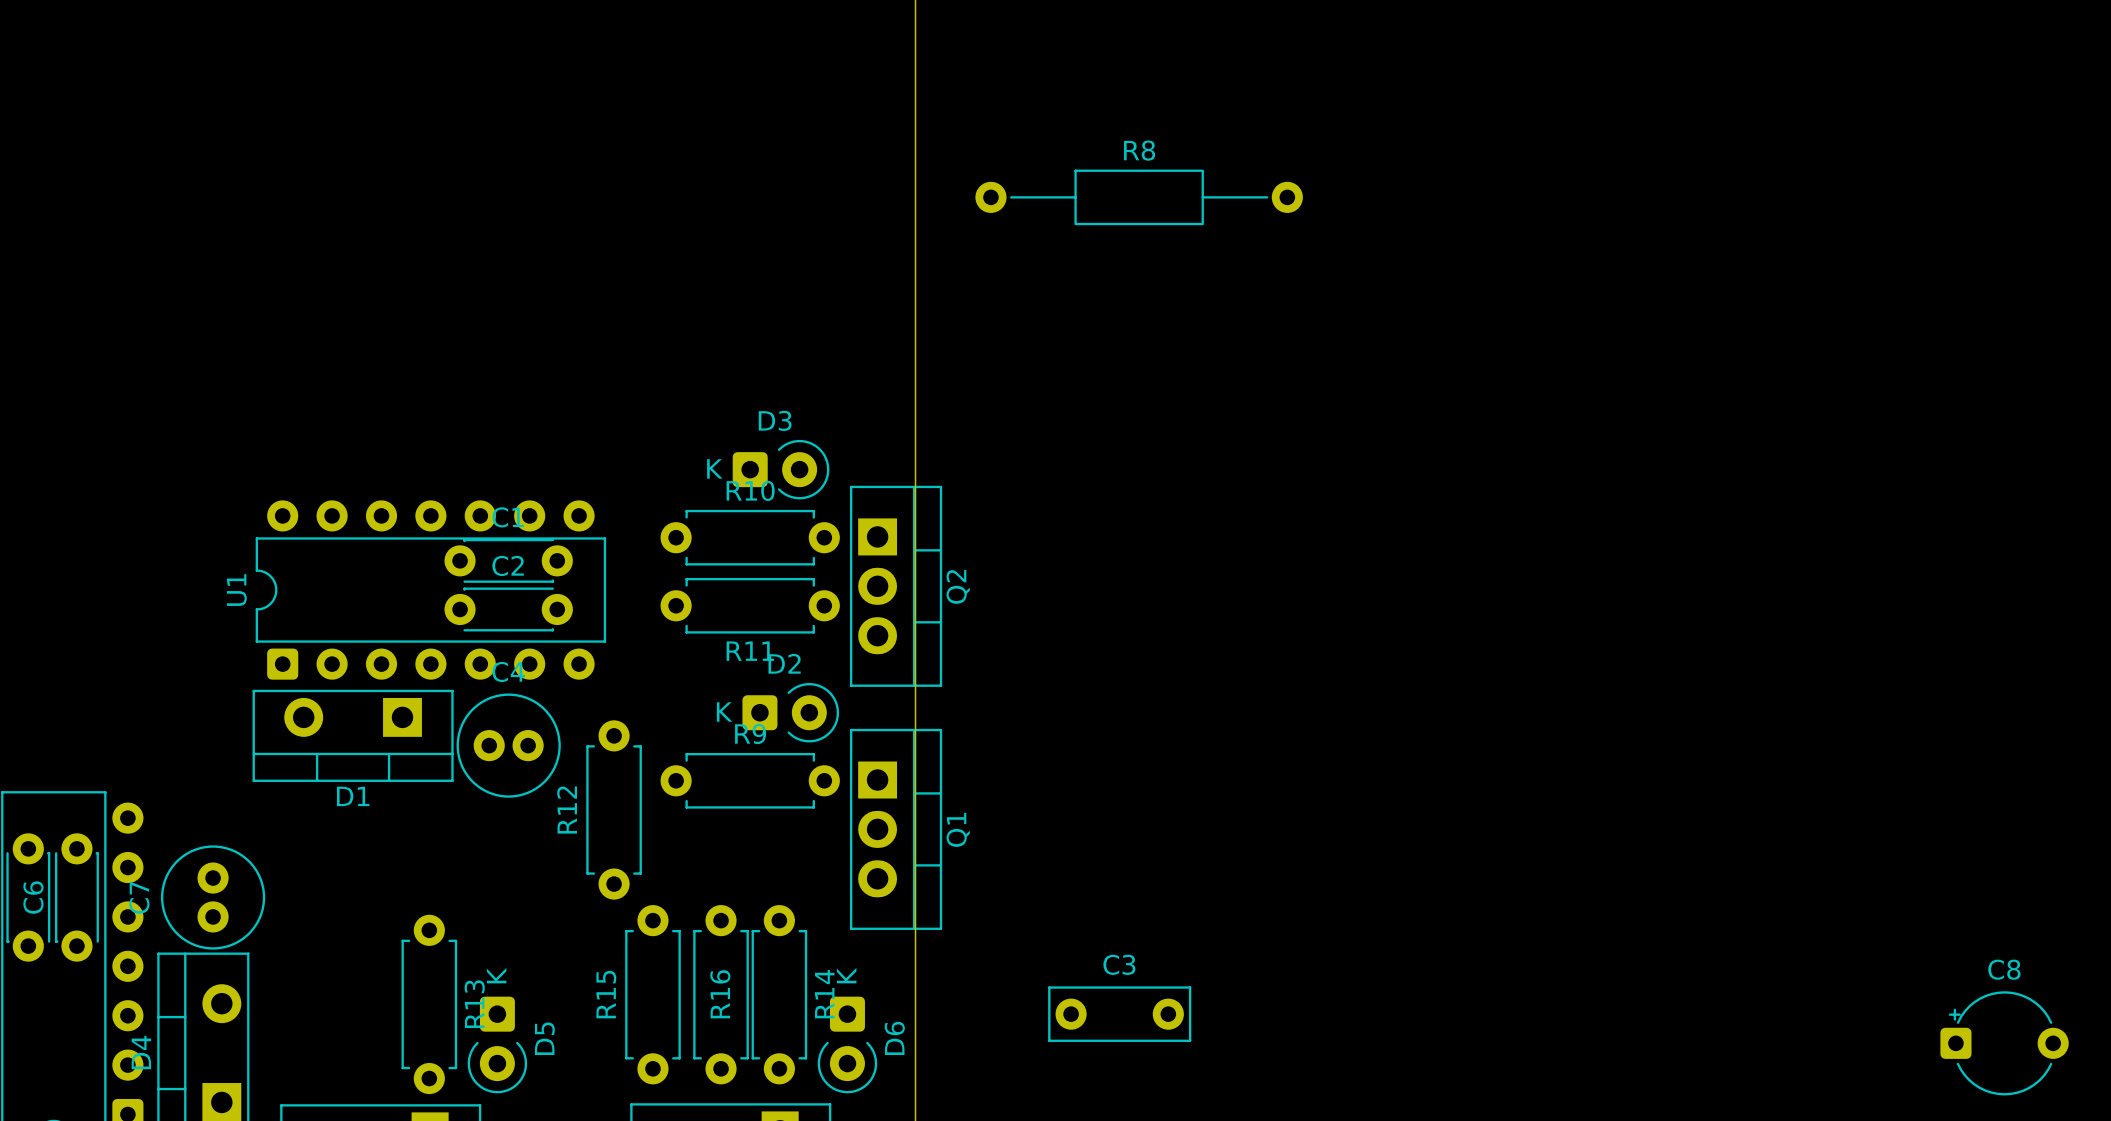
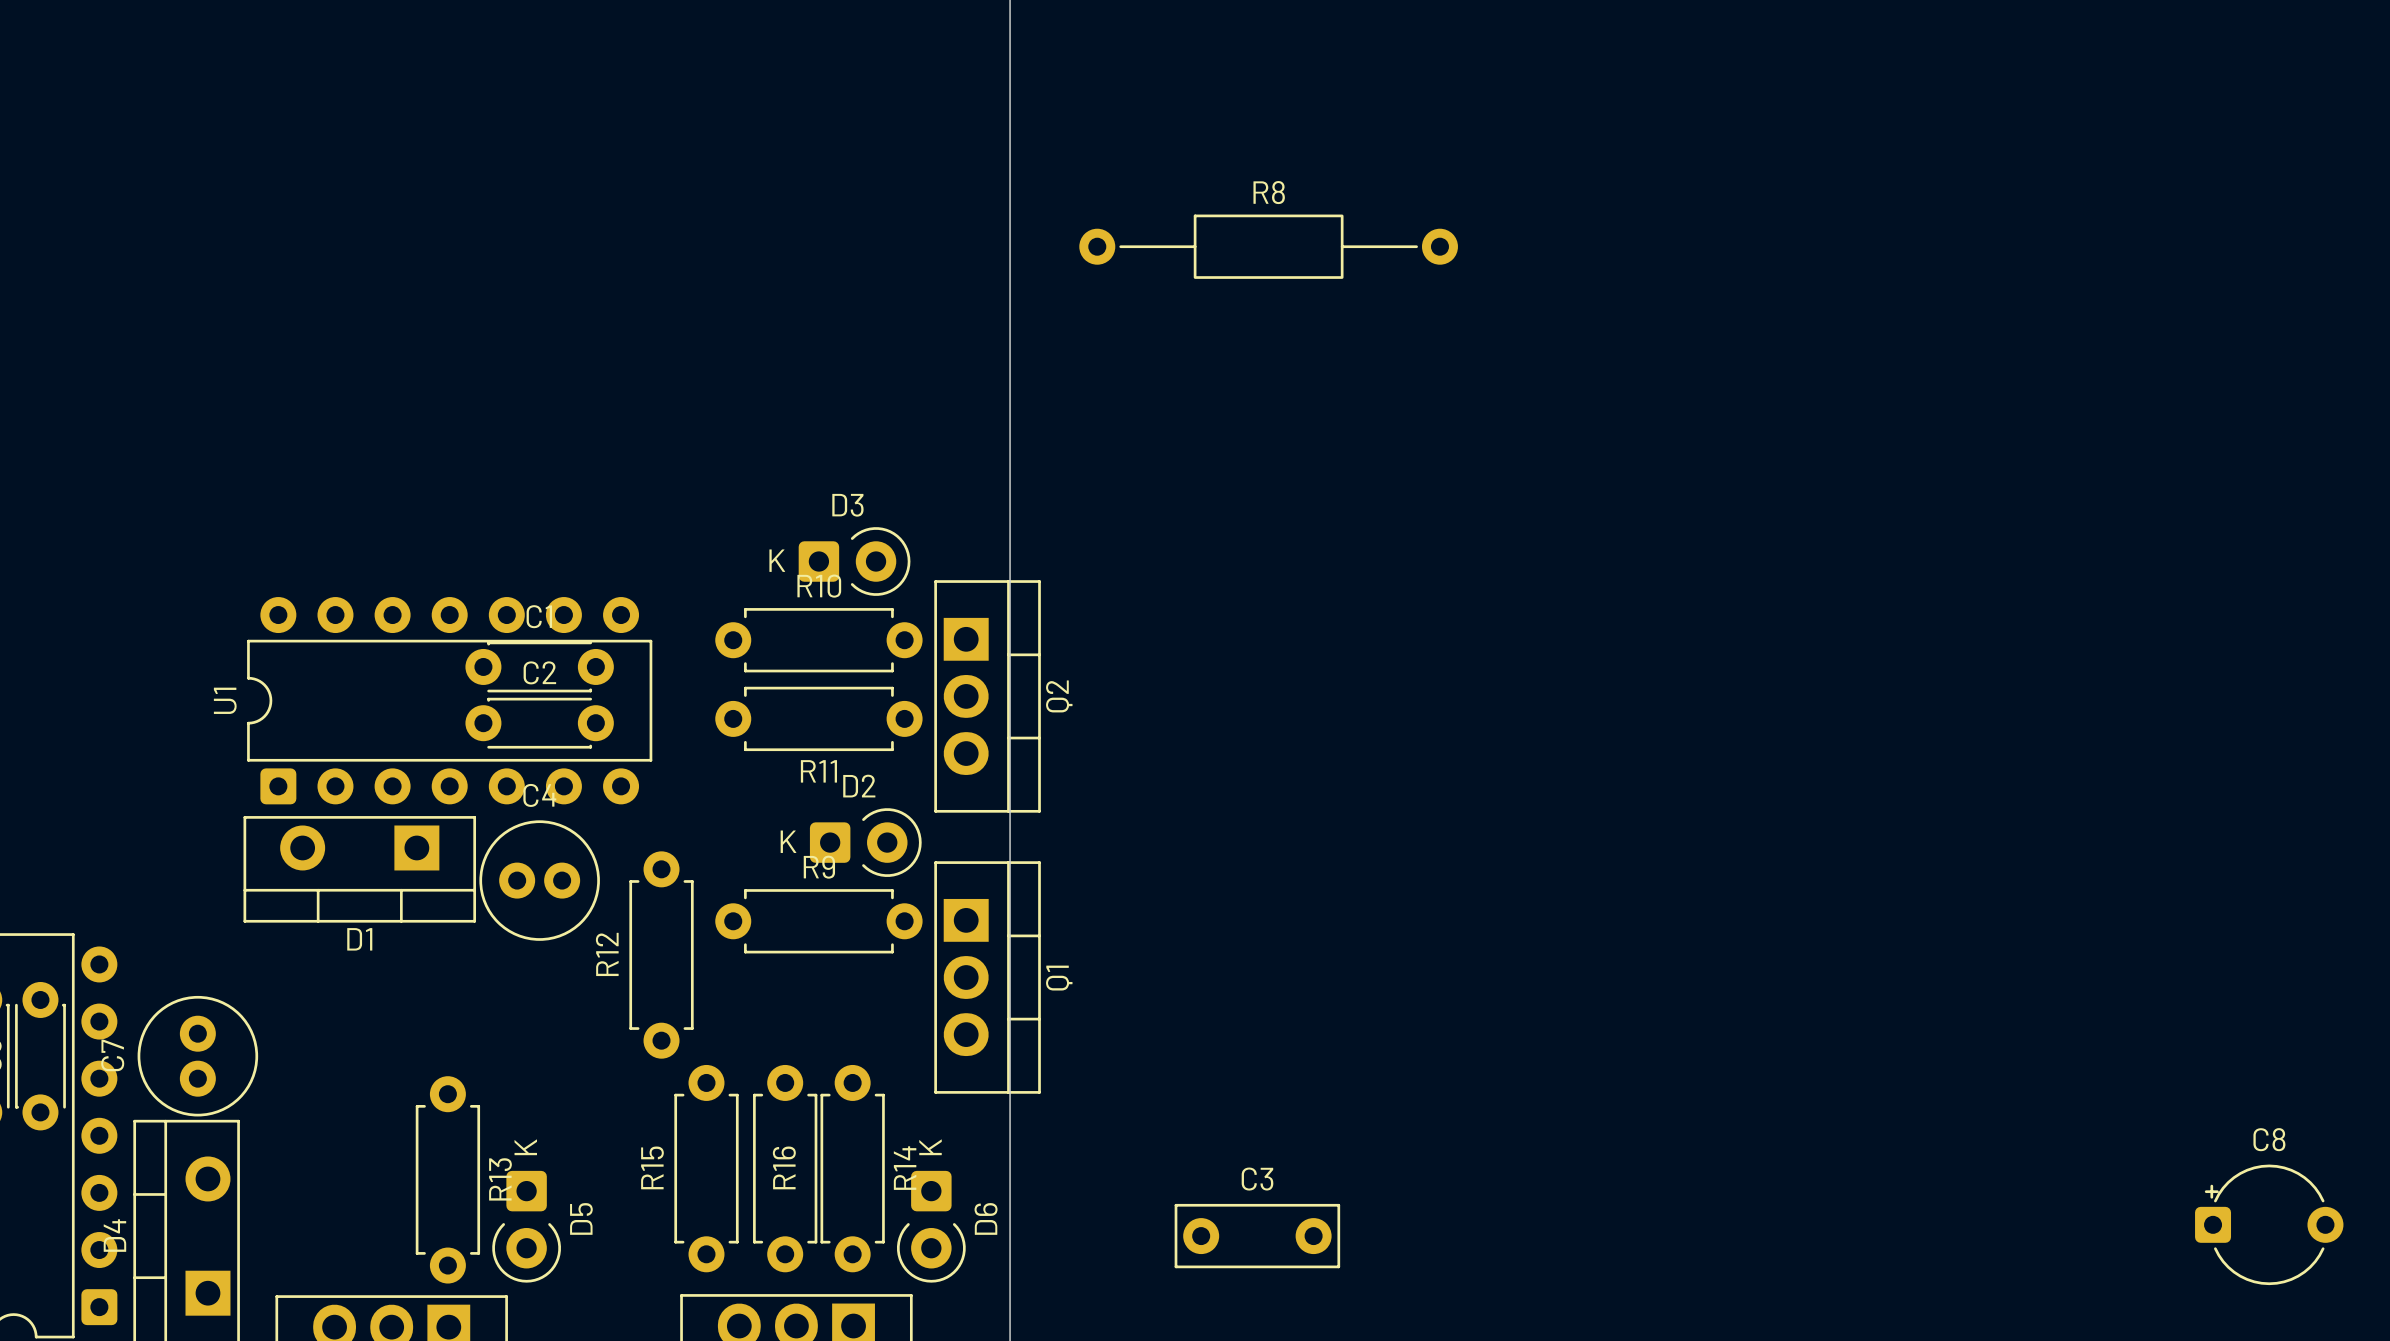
C3 position: (1119, 1014) -> (1257, 1236)

